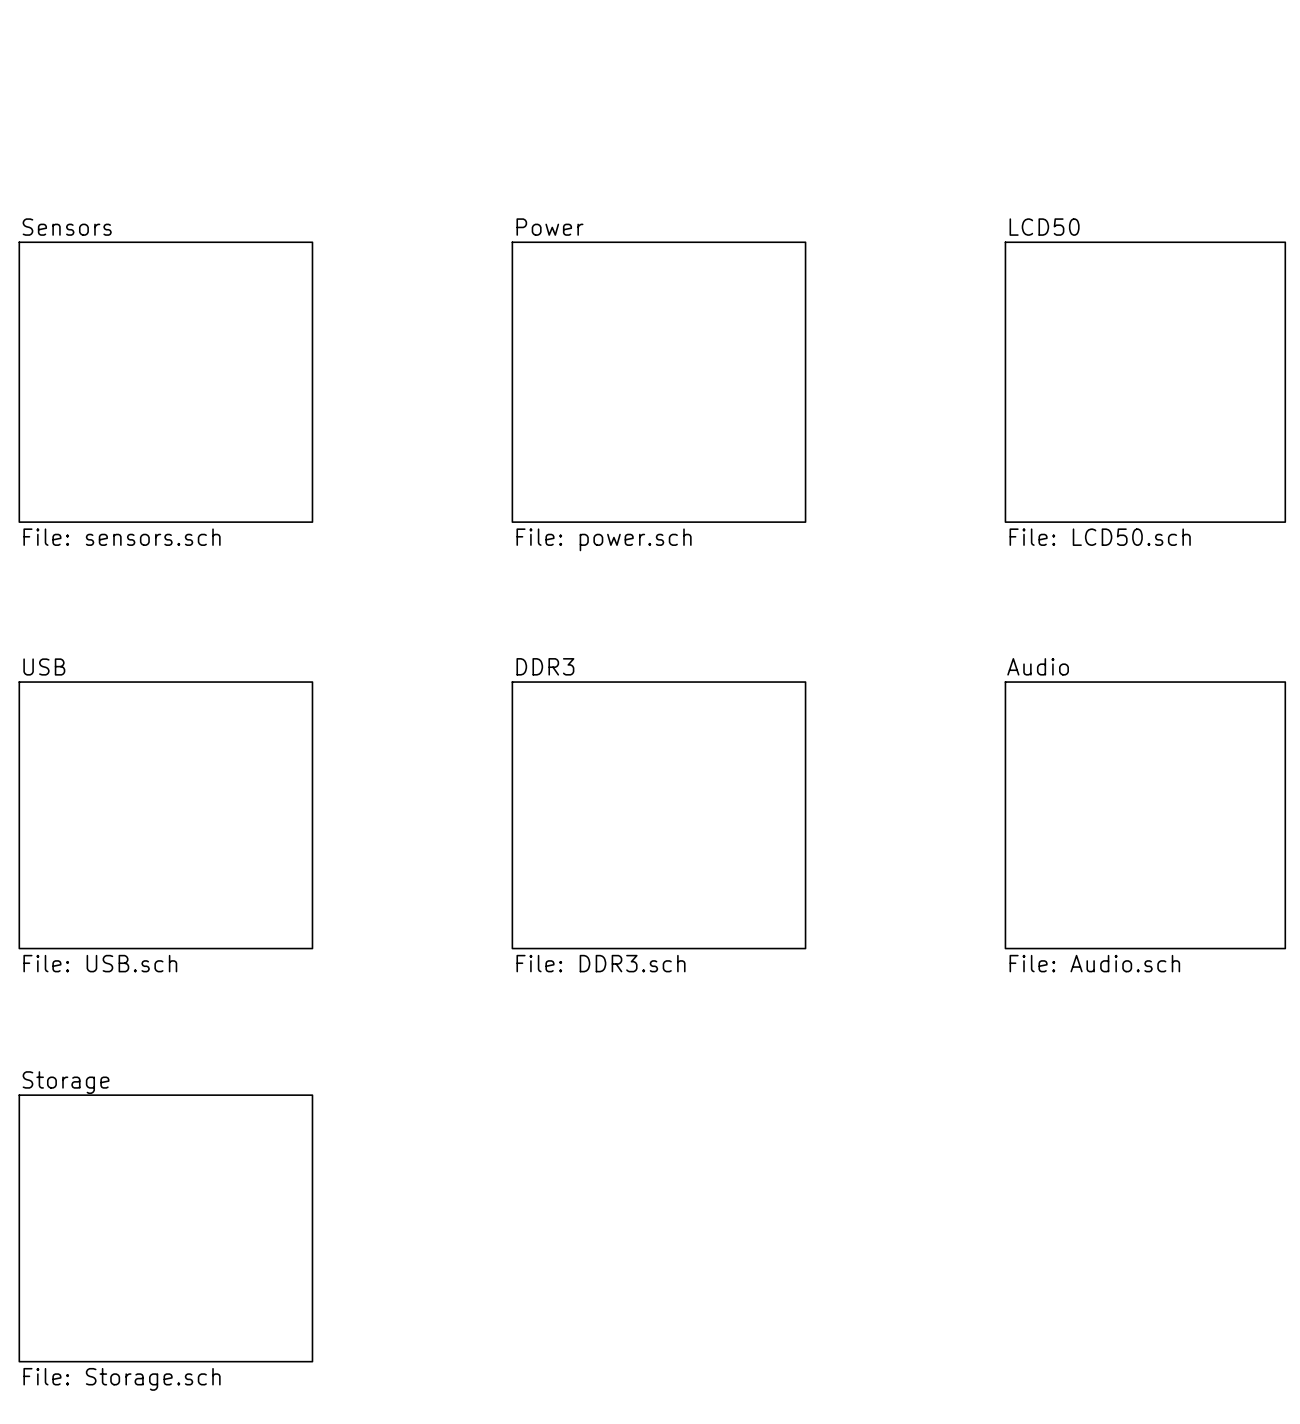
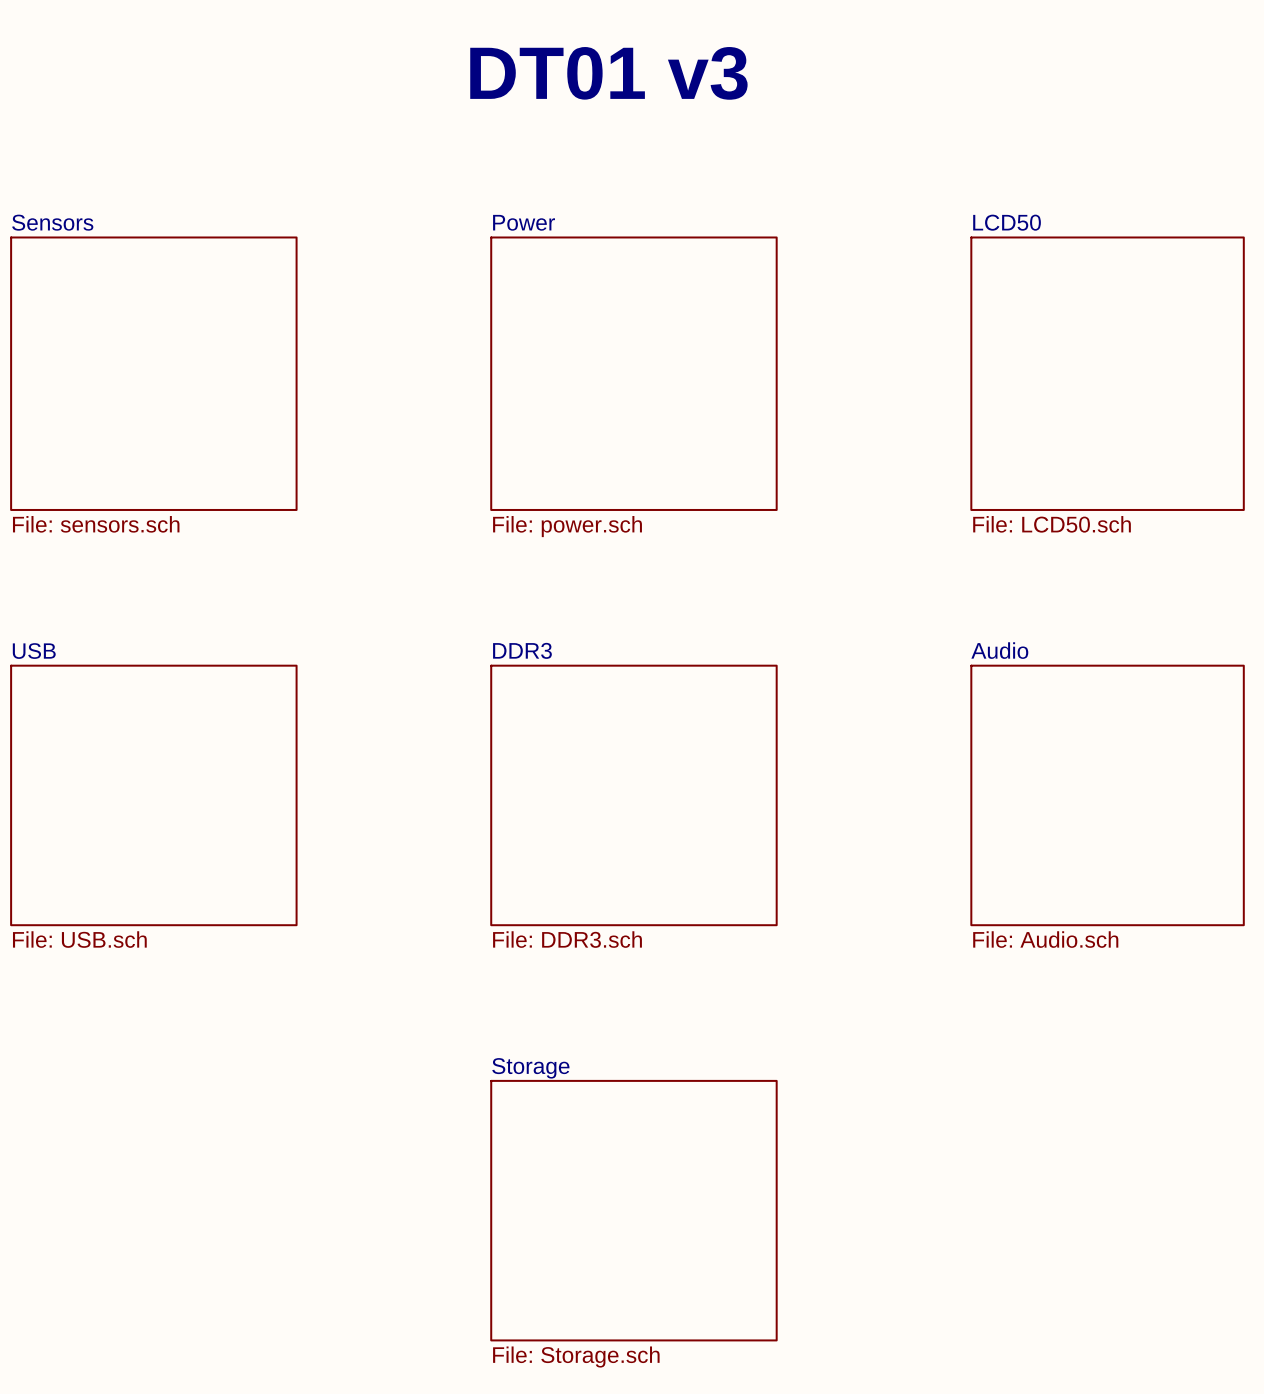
text: none -> DT01 v3 (608, 73)
sheet Storage: File: Storage.sch (165, 1228) -> none
sheet Storage: none -> File: Storage.sch (633, 1210)

